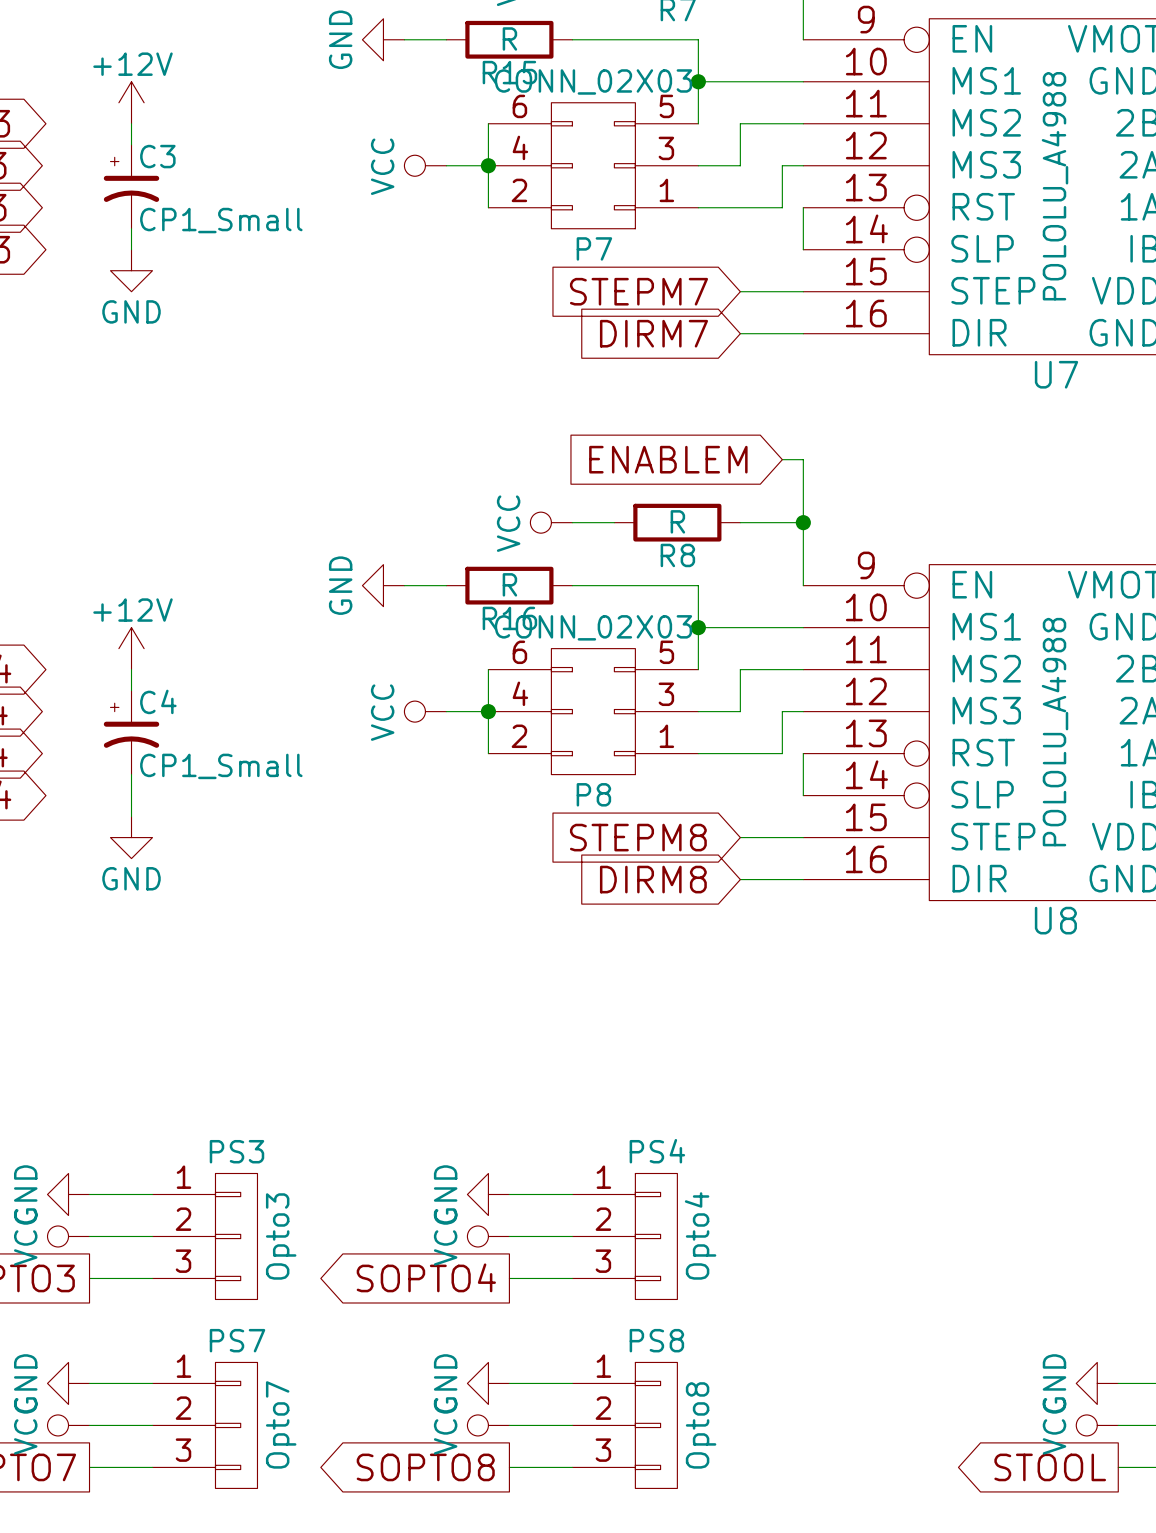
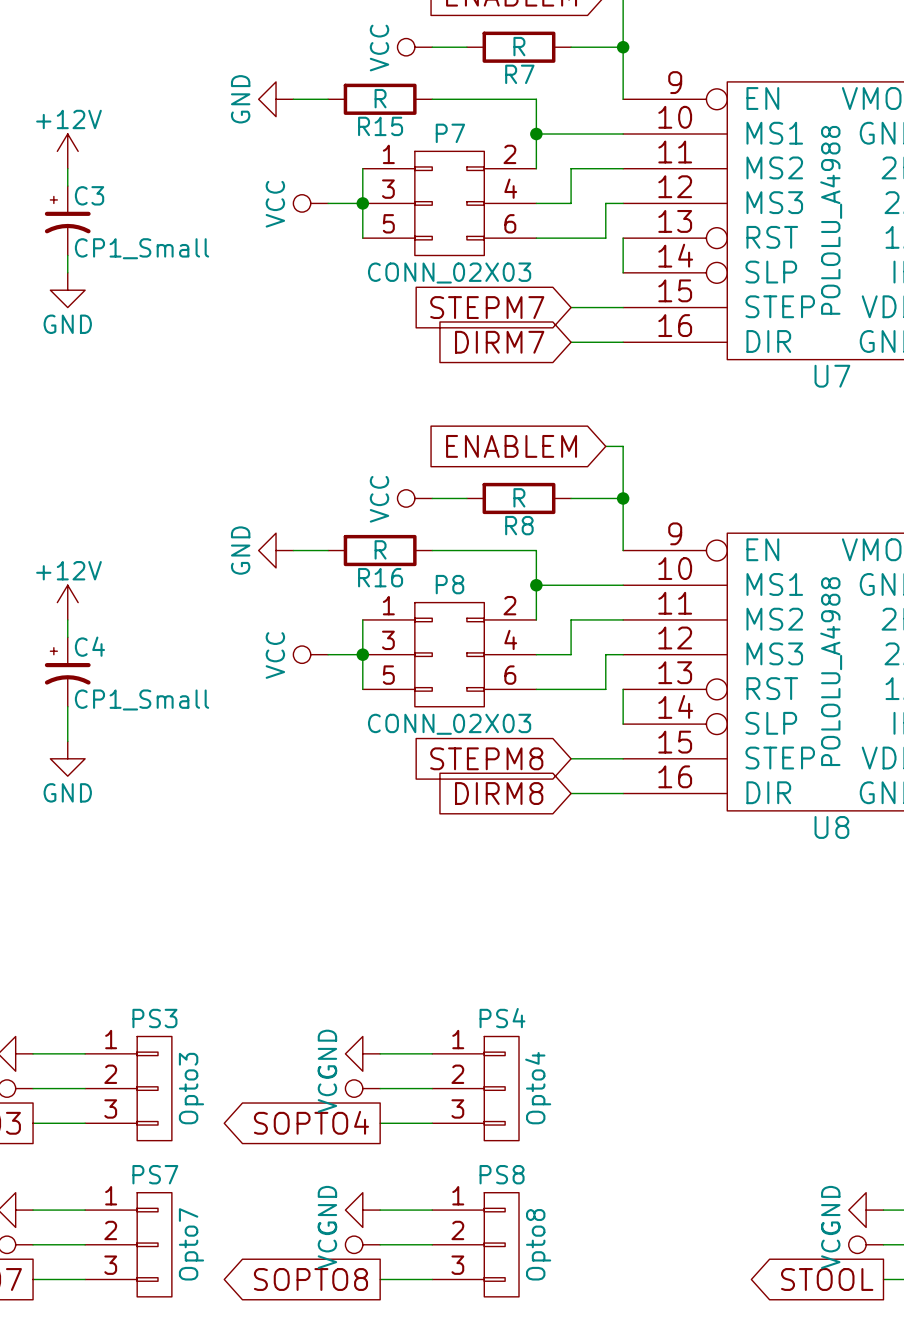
P7 rotation: 0° (593, 165) -> 180° (449, 203)
P8 rotation: 0° (593, 711) -> 180° (449, 654)

